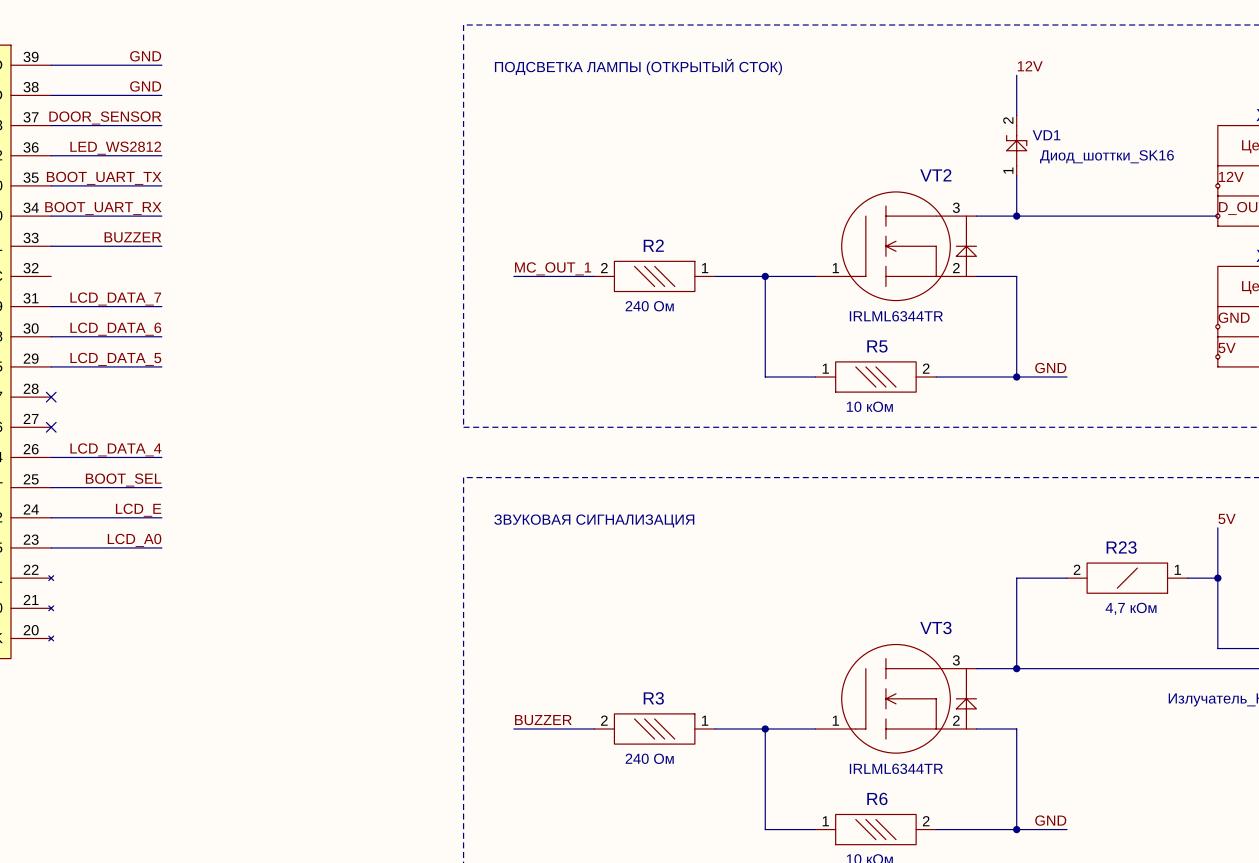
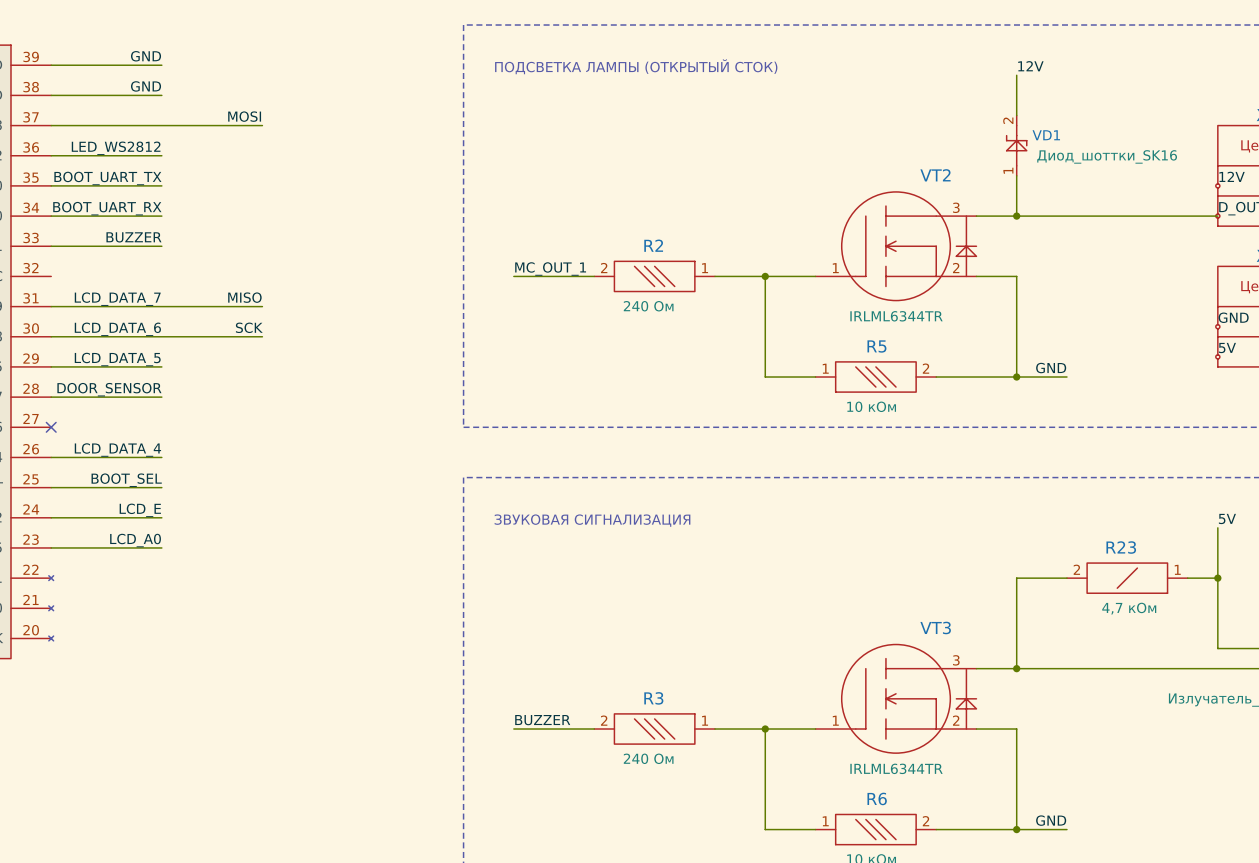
label: none -> MOSI (244, 116)
label: DOOR_SENSOR (105, 117) -> none
wire: none -> (161, 125) (262, 125)
label: none -> MISO (244, 297)
wire: none -> (161, 306) (262, 306)
label: none -> SCK (249, 327)
wire: none -> (161, 336) (262, 336)
label: none -> DOOR_SENSOR (109, 389)
wire: none -> (51, 397) (161, 397)
no-connect mark: (51, 397) -> none

